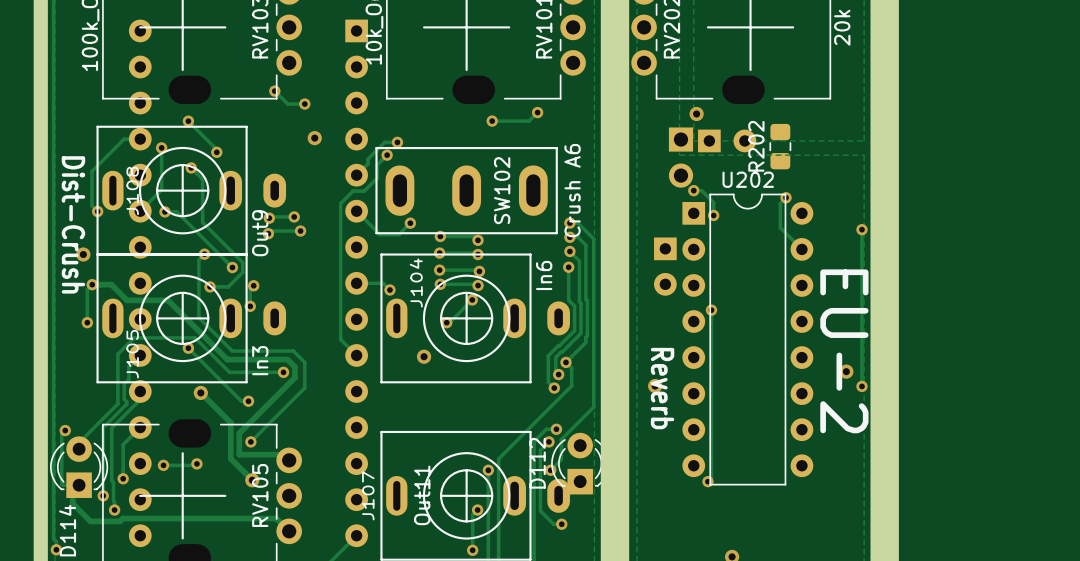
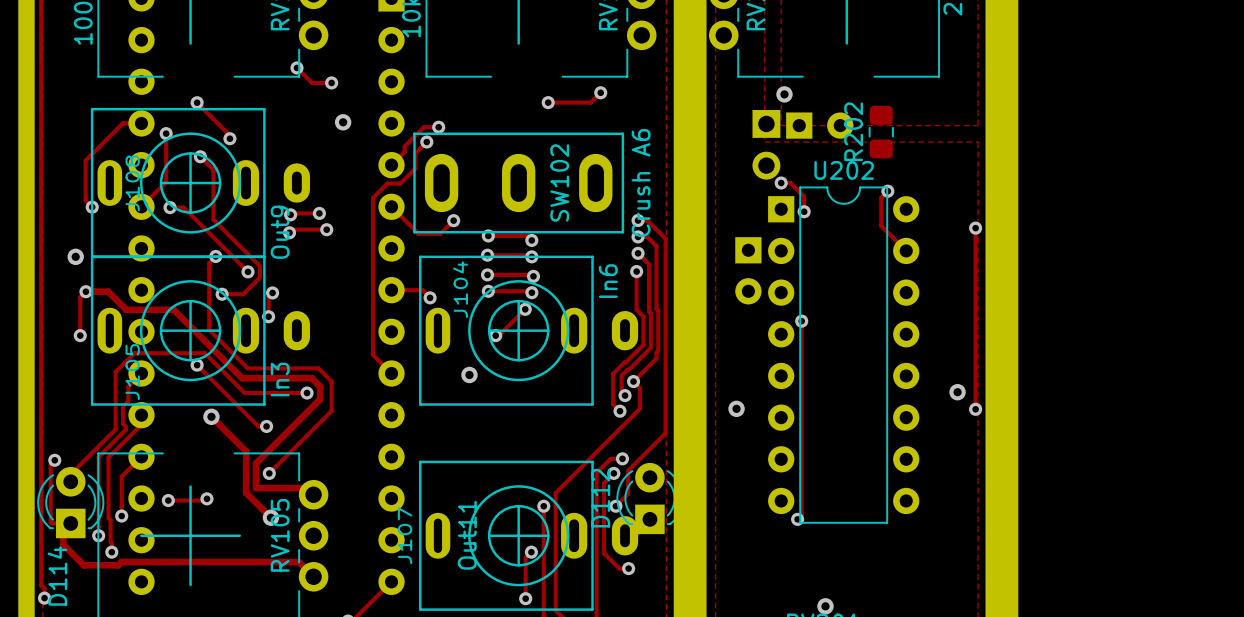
text: Dist-Crush (73, 224) -> none
text: EU-2 (844, 351) -> none
text: Reverb (662, 388) -> none

